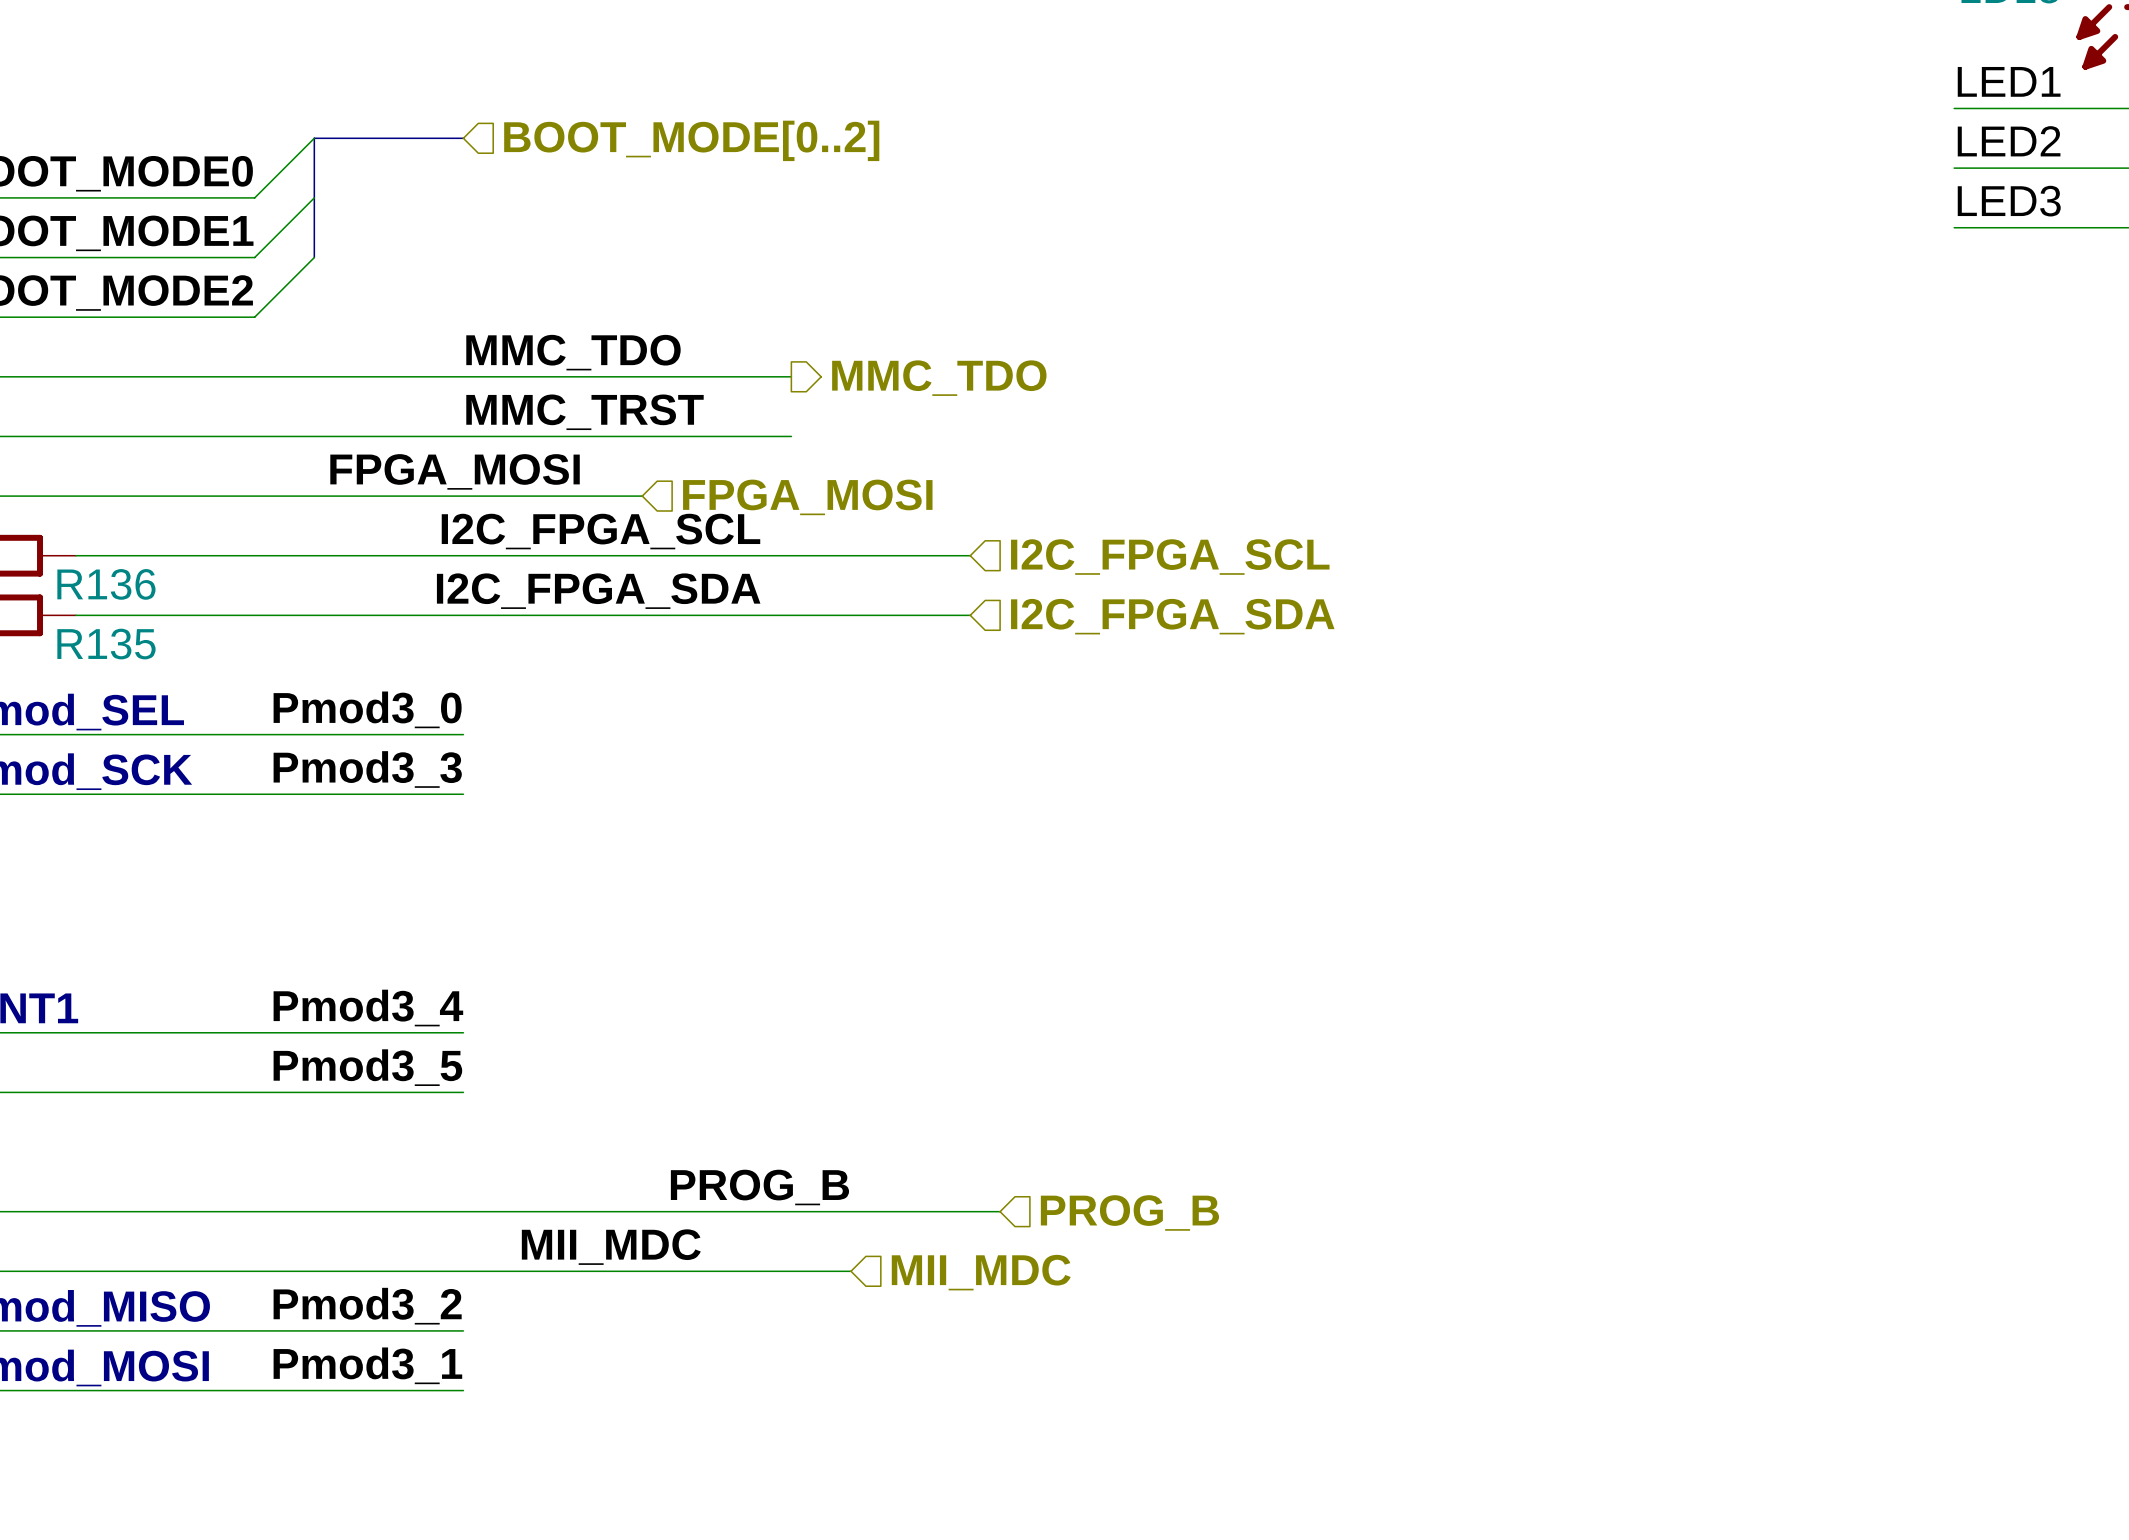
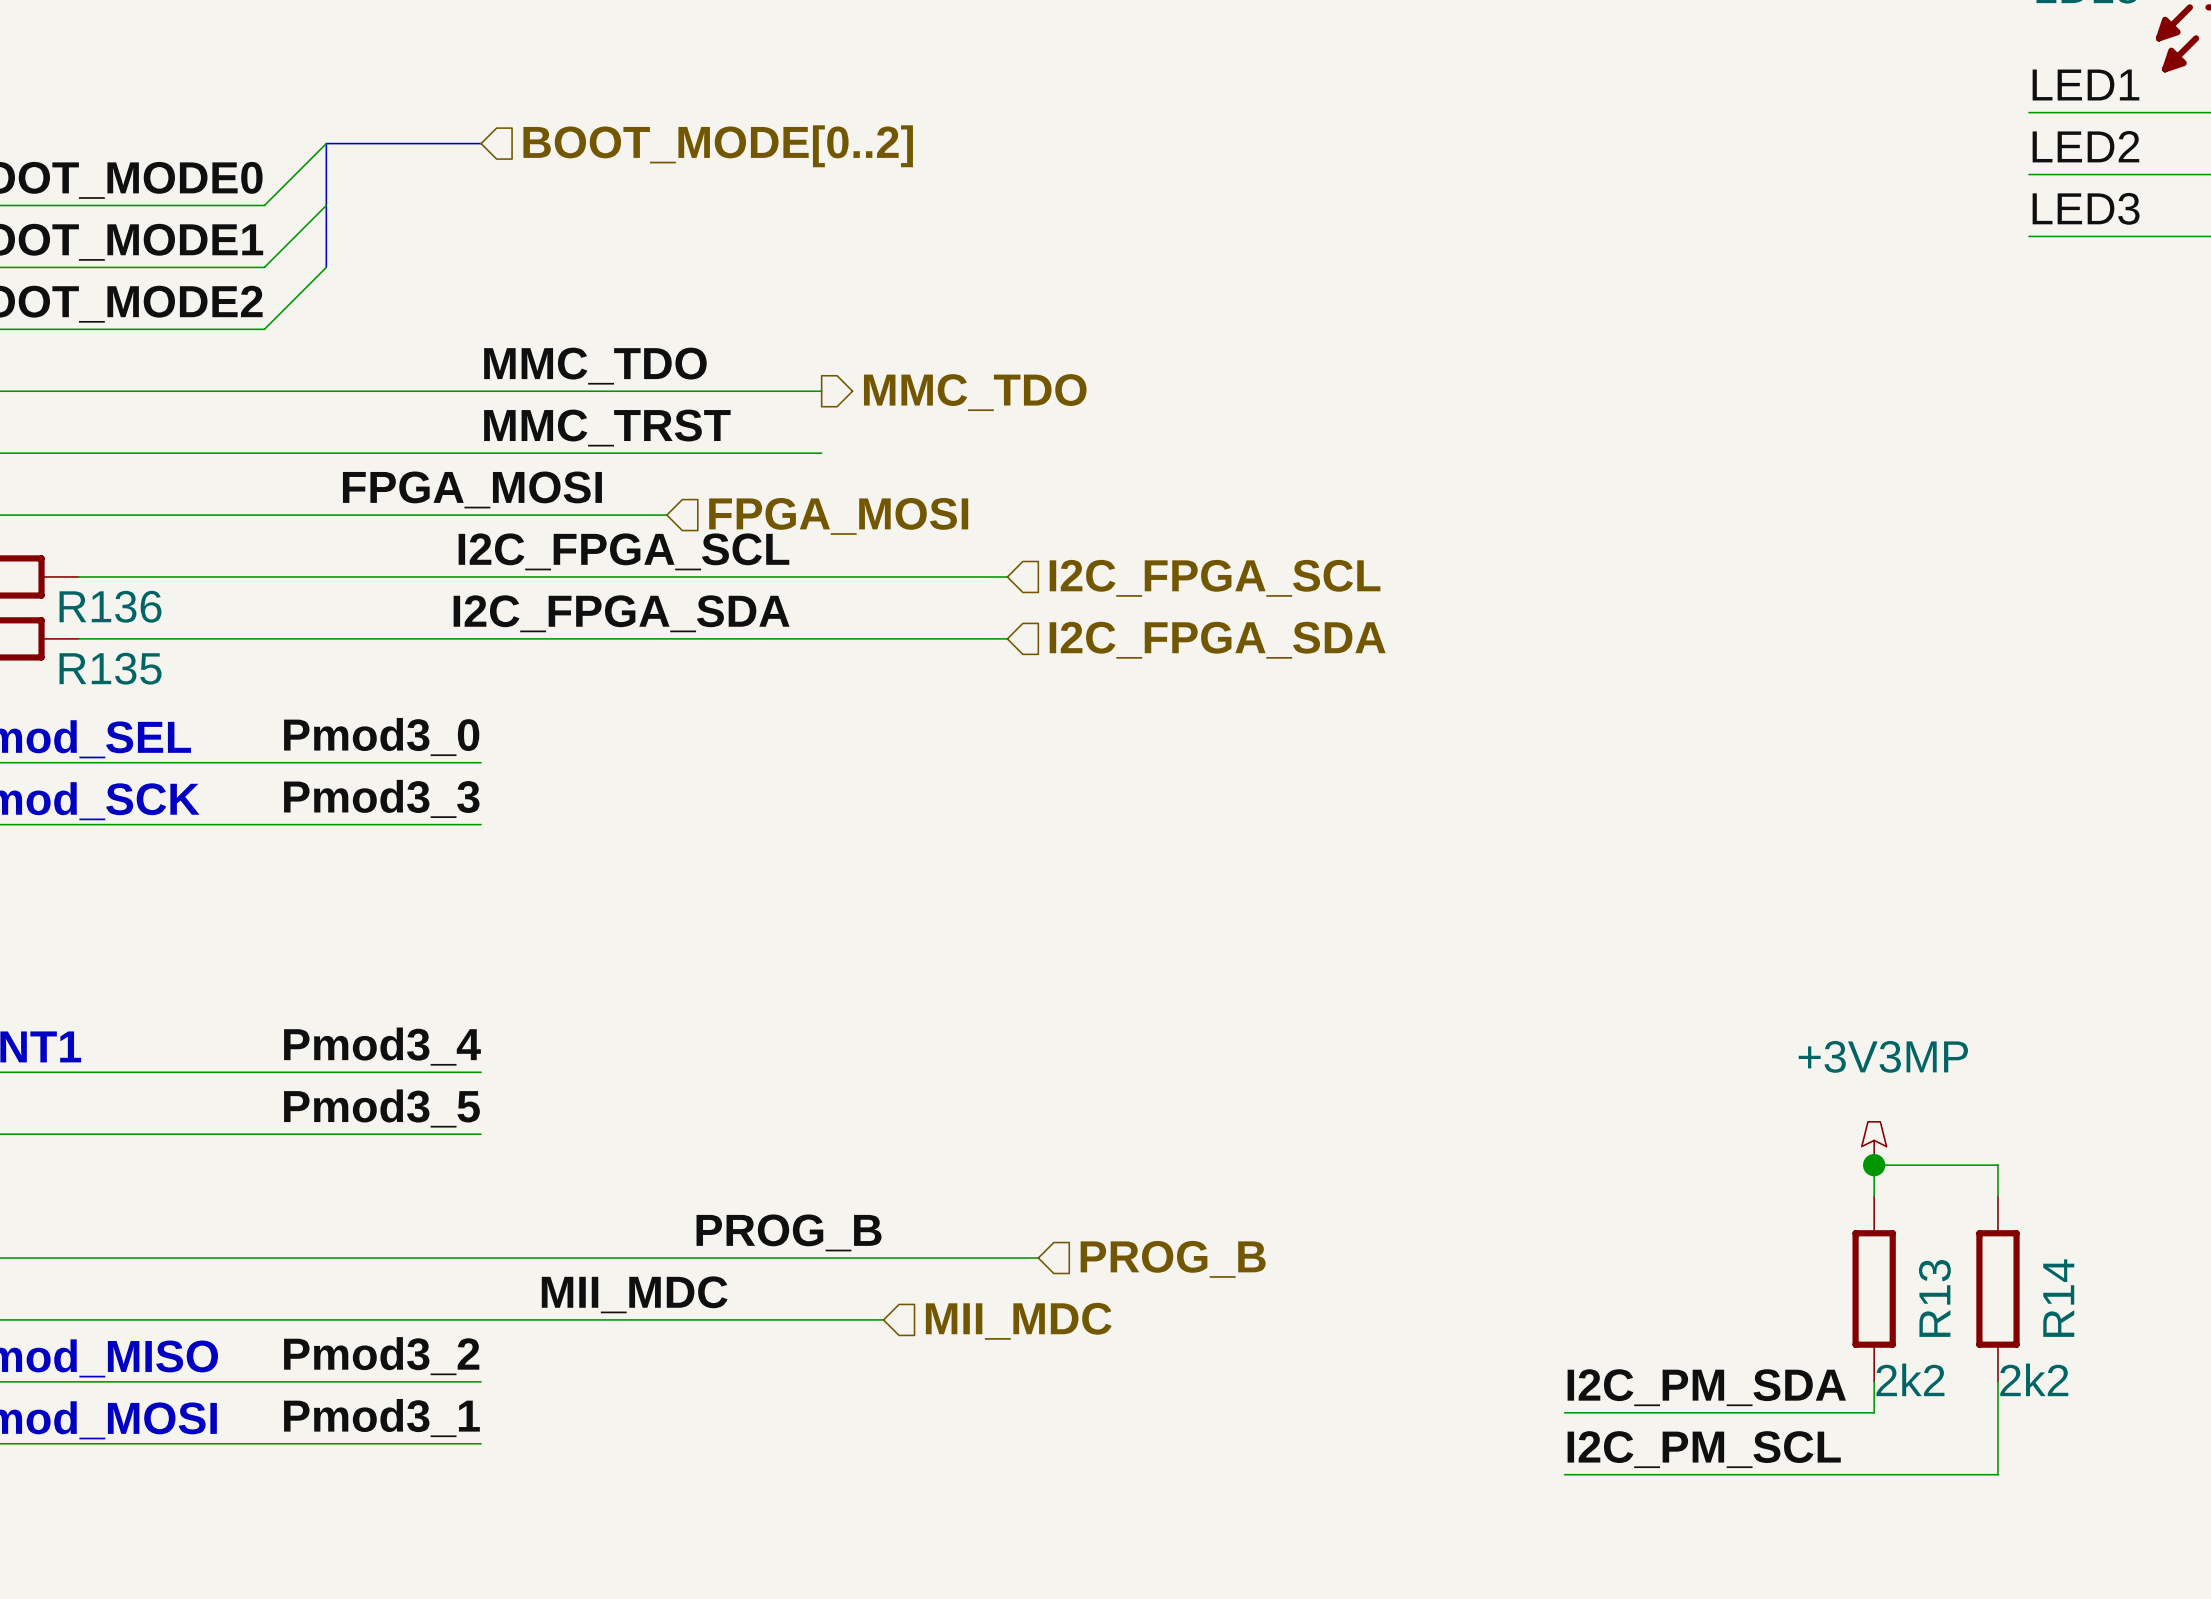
power symbol: none -> +3V3MP (1874, 1143)
junction: none -> (1874, 1165)
wire: none -> (1874, 1196) (1874, 1165) (1997, 1165) (1997, 1196)
R13: none -> (1874, 1288)
R14: none -> (1997, 1288)
wire: none -> (1874, 1381) (1874, 1412) (1564, 1412)
wire: none -> (1997, 1381) (1997, 1474) (1564, 1474)
label: none -> I2C_PM_SDA (1706, 1387)
label: none -> I2C_PM_SCL (1704, 1449)

